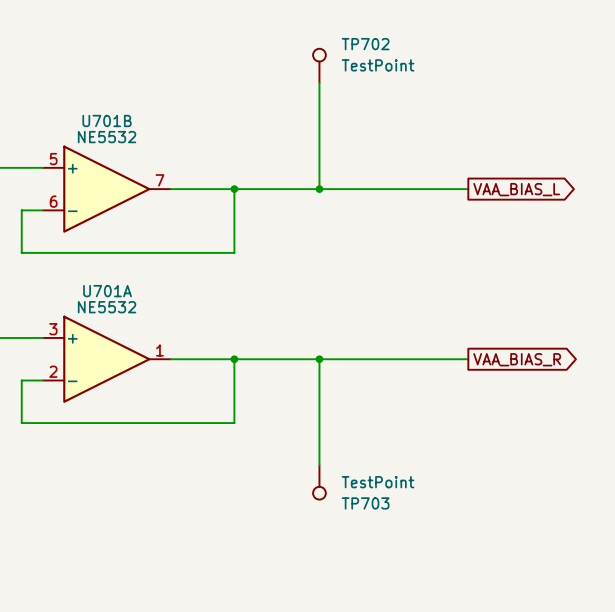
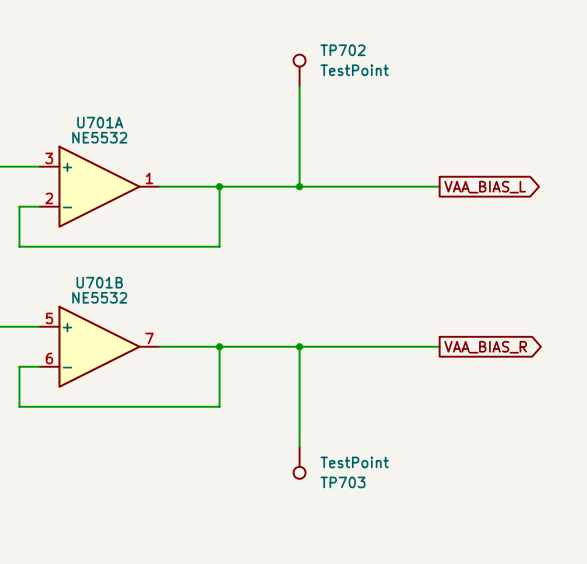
U701B position: (106, 189) -> (99, 346)
U701A position: (106, 359) -> (99, 186)

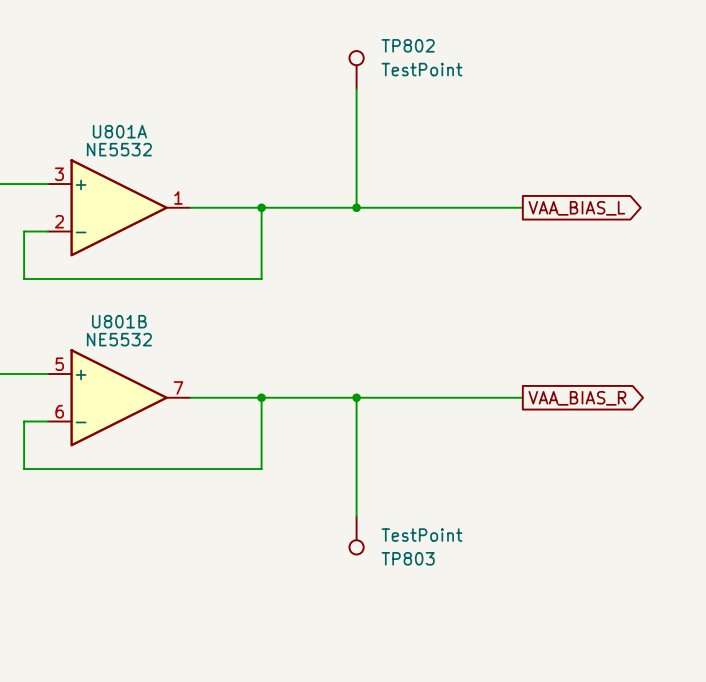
TP702 name: TP702 (343, 50) -> TP802 (408, 45)
U701A name: U701A (100, 122) -> U801A (119, 131)
U701B name: U701B (99, 282) -> U801B (119, 321)
TP703 name: TP703 (343, 482) -> TP803 (408, 558)

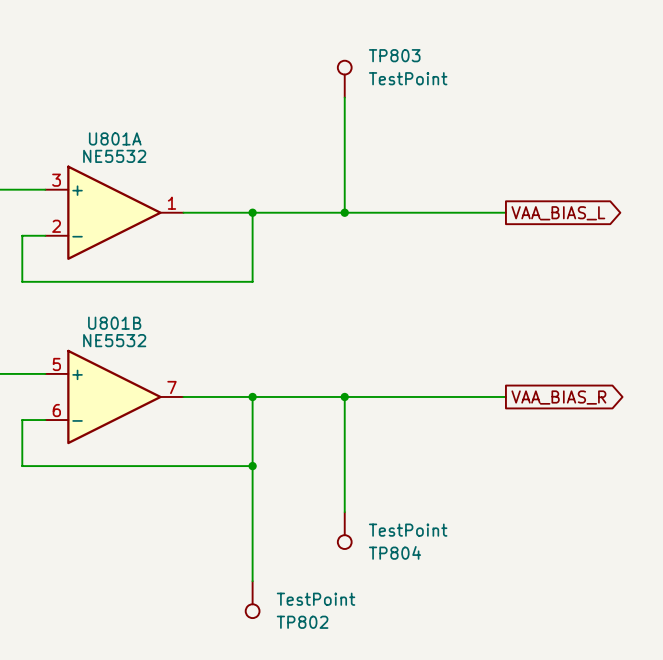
TP802 name: TP802 (408, 45) -> TP803 (394, 55)
wire: none -> (252, 466) (252, 581)
junction: none -> (252, 466)
TP803 name: TP803 (408, 558) -> TP804 (395, 552)
TP802: none -> TestPoint (252, 599)

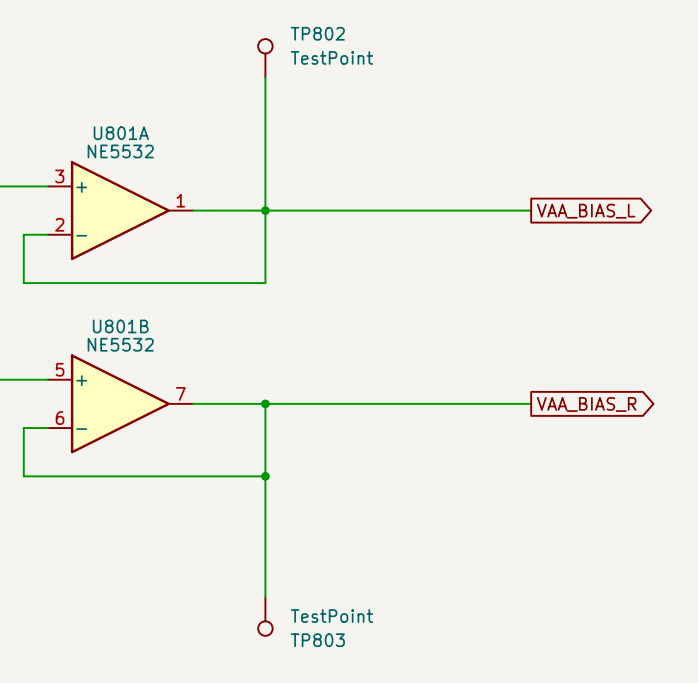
TP802: none -> TestPoint (265, 58)
TP803: TestPoint (344, 79) -> none
wire: none -> (265, 77) (265, 210)
wire: (344, 97) (344, 212) -> none
junction: (344, 212) -> none
wire: (344, 396) (344, 512) -> none
junction: (344, 396) -> none
TP804: TestPoint (344, 530) -> none
TP802 name: TP802 (302, 622) -> TP803 (317, 640)

